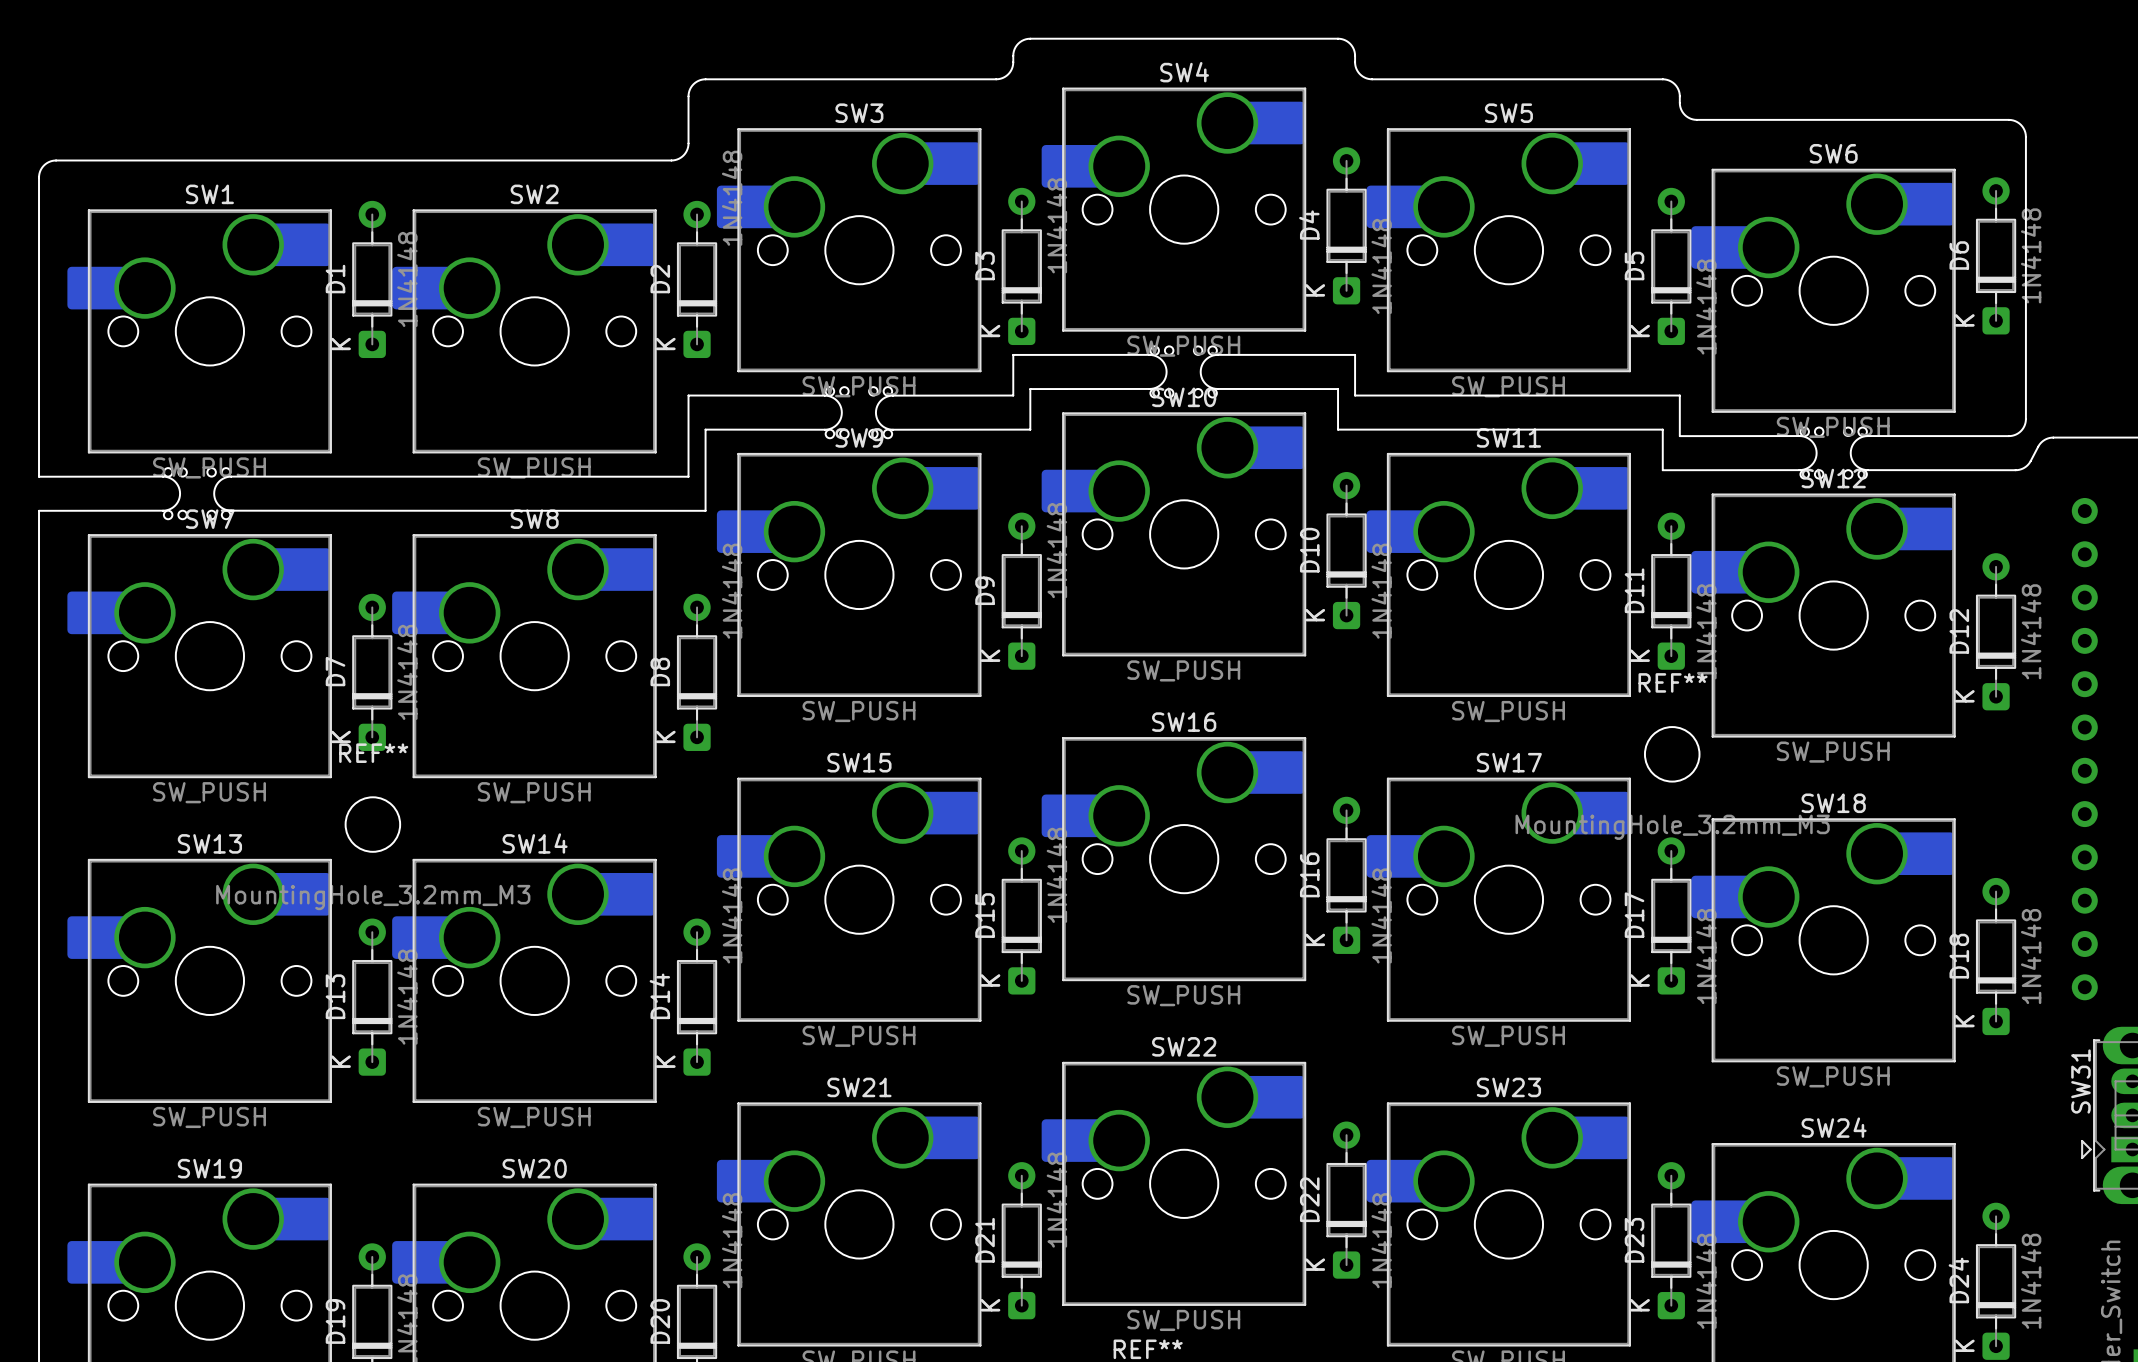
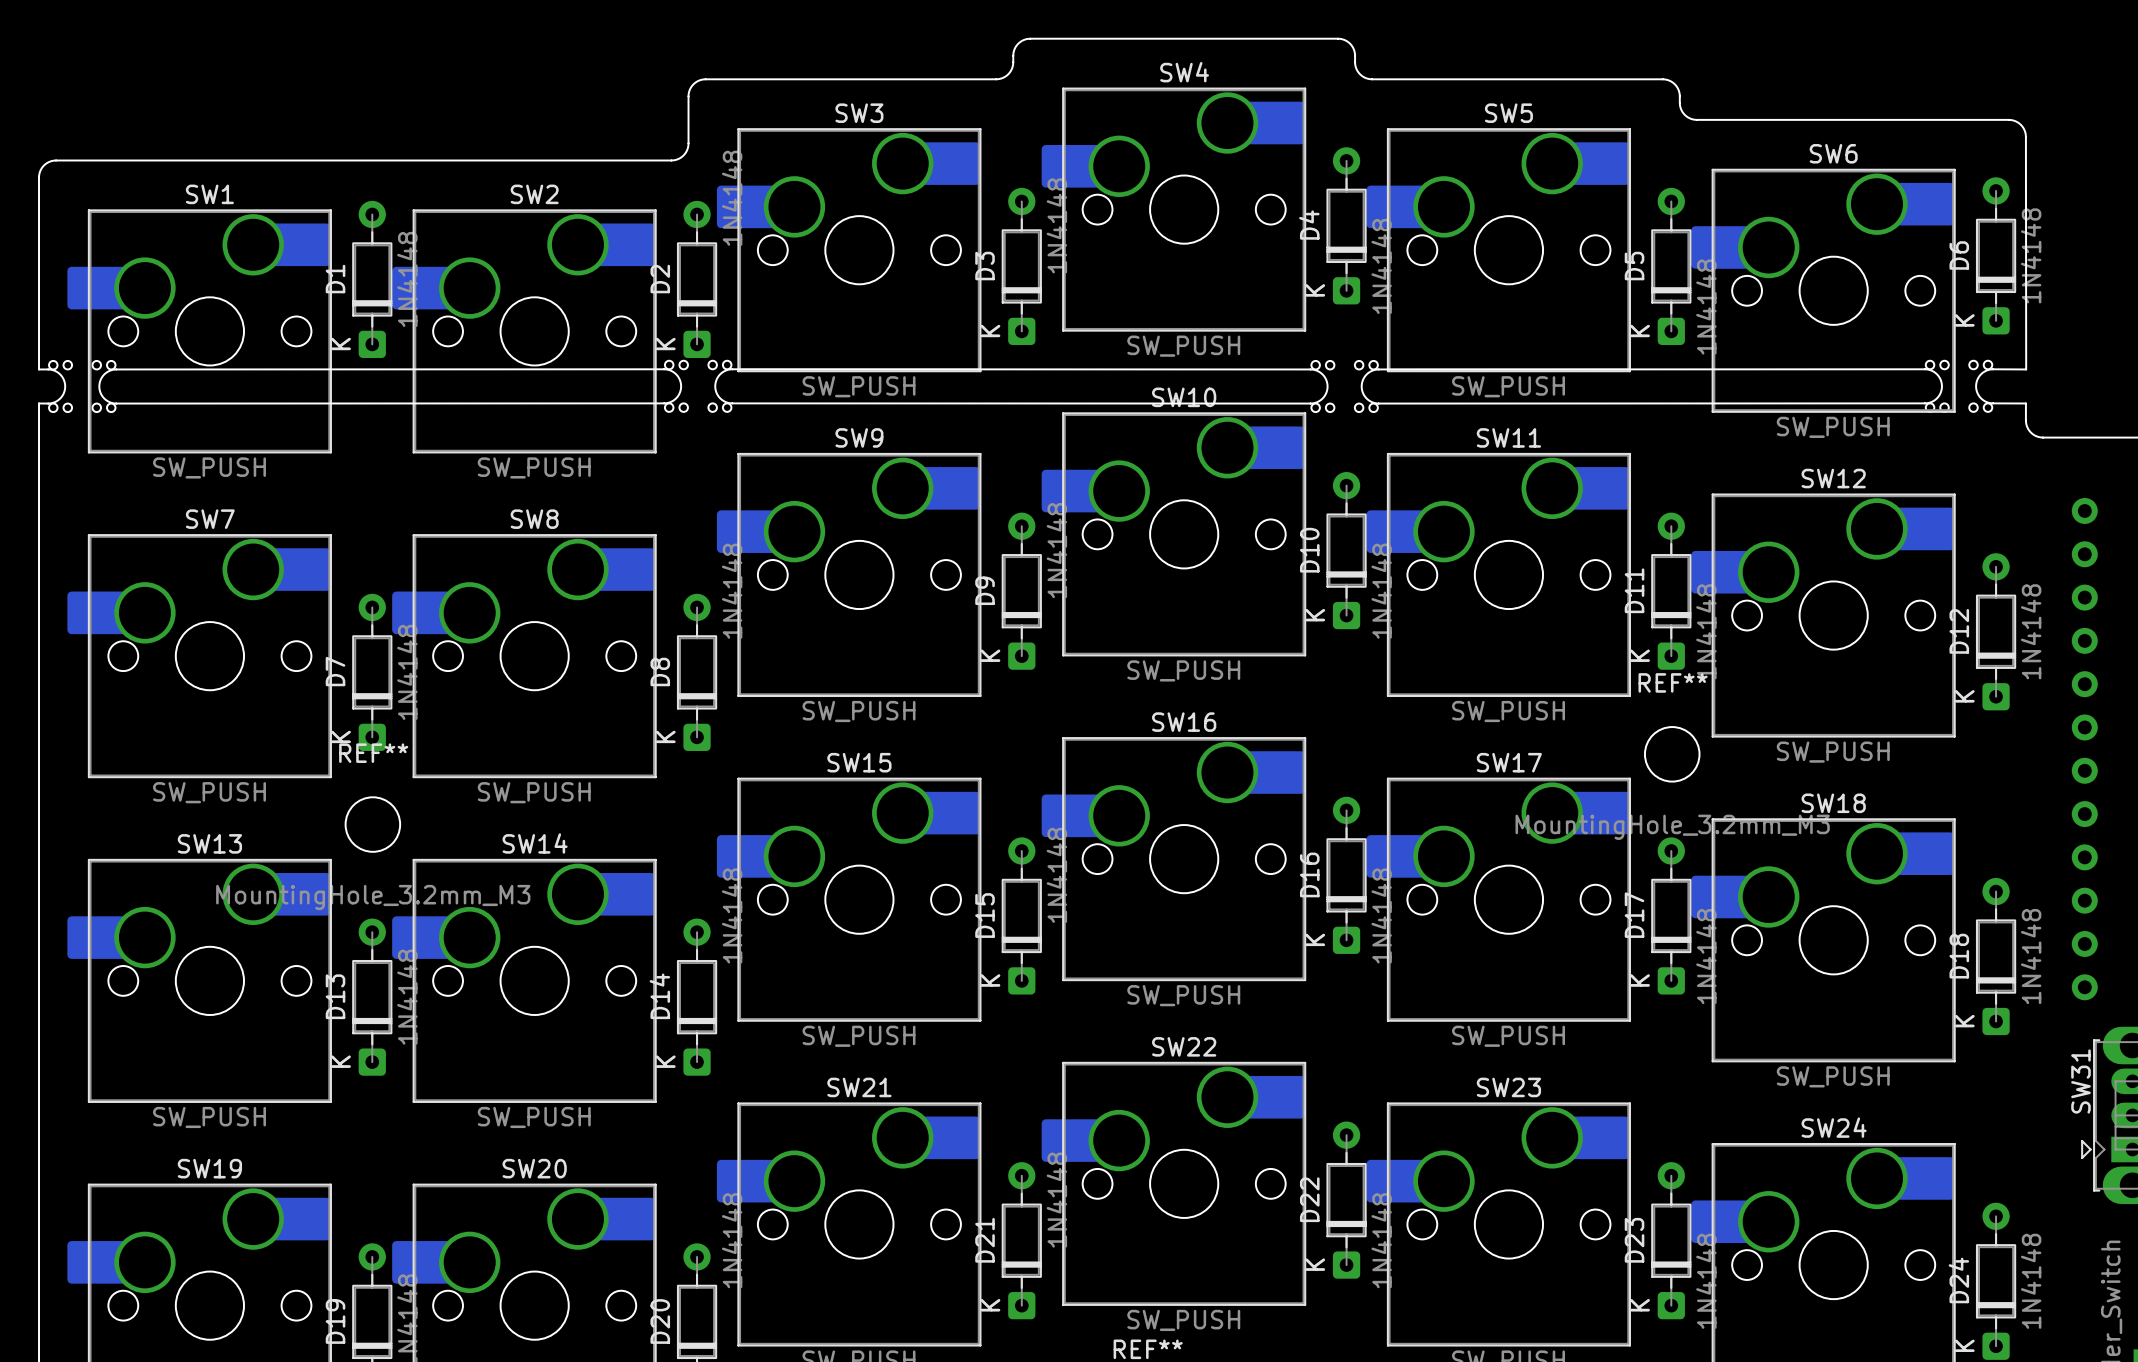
board edge: (2025, 136) (2025, 403) -> (2025, 136) (2026, 369) (1993, 369)
board edge: (1149, 354) (1013, 354) (1013, 395) (893, 395) -> none
board edge: (1217, 354) (1355, 354) (1355, 395) (1679, 395) (1679, 436) (1799, 436) -> none
board edge: (39, 369) (39, 403) -> (39, 369) (48, 369)
board edge: none -> (664, 369) (116, 369)
board edge: none -> (732, 369) (1310, 369)
board edge: none -> (1924, 369) (1378, 369)
part position: (1183, 371) -> (1344, 386)
board edge: (1149, 388) (1030, 389) (1030, 429) (893, 429) -> none
board edge: (1217, 388) (1338, 389) (1338, 429) (1662, 429) (1662, 470) (1799, 470) -> none
board edge: (824, 395) (688, 395) (688, 476) (231, 476) -> none
board edge: none -> (39, 403) (48, 403)
board edge: none -> (664, 403) (116, 403)
board edge: none -> (732, 403) (1310, 403)
board edge: none -> (1924, 403) (1378, 403)
board edge: none -> (1993, 403) (2025, 403)
part position: (858, 412) -> (698, 386)
board edge: (2025, 419) (2020, 431) (2010, 436) (1867, 436) -> none
board edge: (824, 429) (705, 429) (705, 510) (231, 510) -> none
board edge: (2053, 437) (2041, 442) (2028, 464) (2019, 469) (1867, 470) -> (2053, 437) (2040, 437) (2032, 434) (2027, 427) (2025, 419)
part position: (1833, 453) -> (1959, 386)
board edge: (39, 476) (163, 476) -> none
part position: (197, 493) -> (82, 386)
board edge: (39, 510) (163, 510) -> (39, 510) (39, 476)

